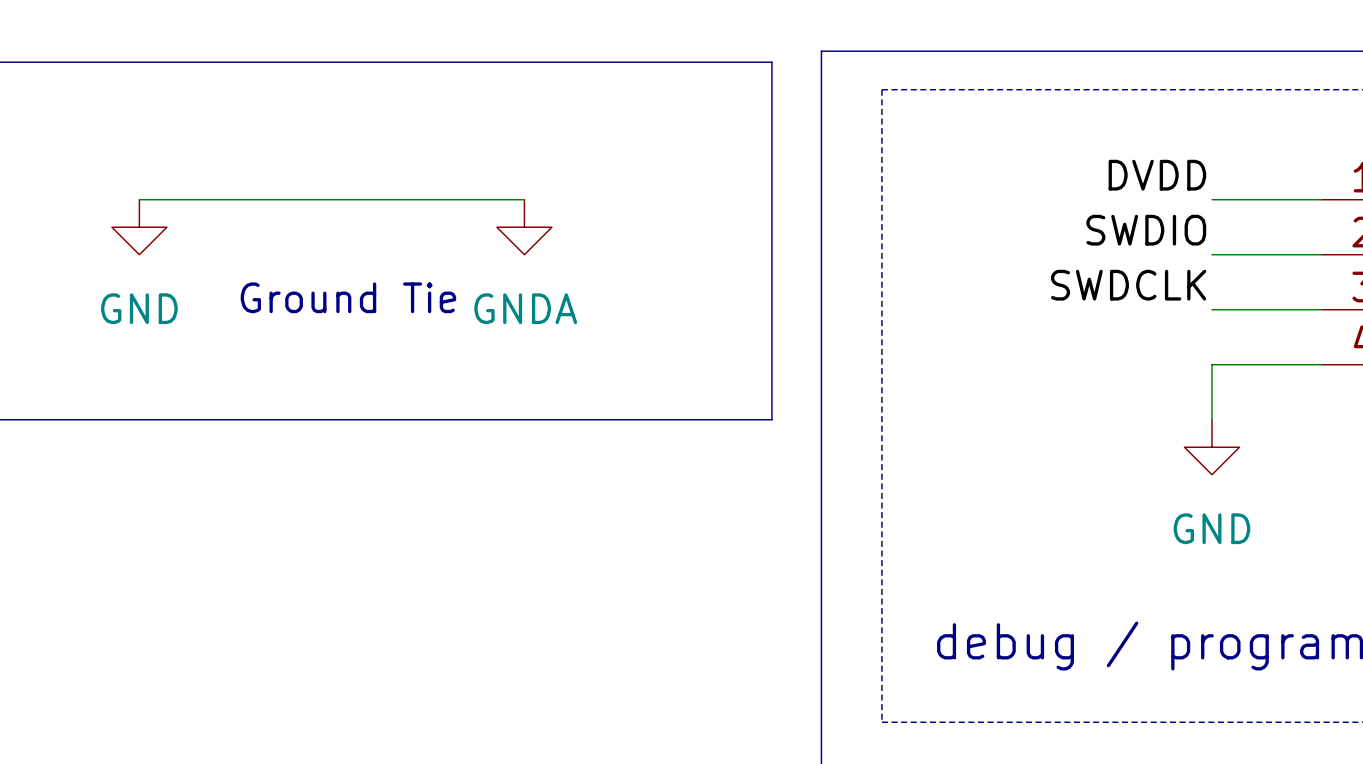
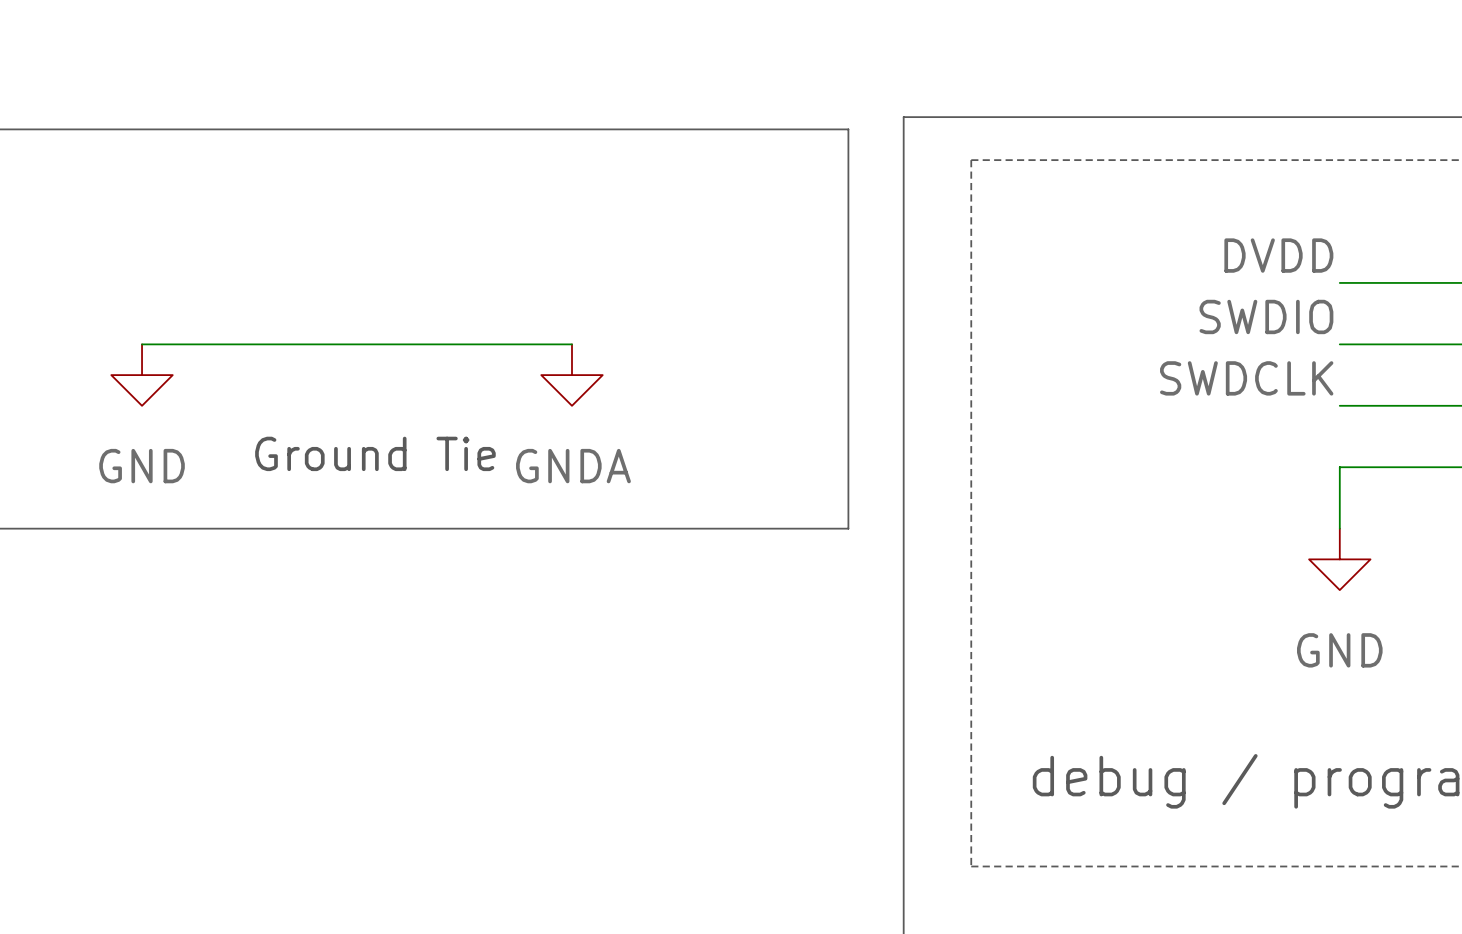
wire: (139, 199) (524, 199) -> (142, 344) (571, 344)
power symbol position: GND (139, 227) -> GND (142, 375)
power symbol position: GNDA (524, 227) -> GNDA (571, 375)
text position: Ground Tie (348, 297) -> Ground Tie (375, 453)

